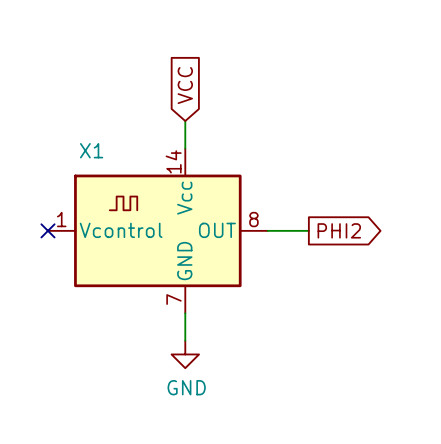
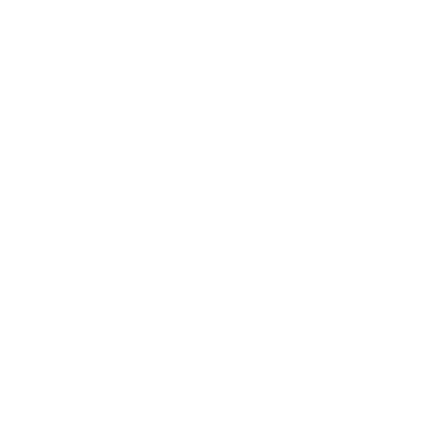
global label: VCC (185, 85) -> none
wire: (185, 121) (185, 148) -> none
no-connect mark: (47, 230) -> none
X1: (157, 230) -> none
wire: (267, 230) (308, 230) -> none
global label: PHI2 (339, 230) -> none
wire: (185, 313) (185, 340) -> none
power symbol: GND (185, 354) -> none

